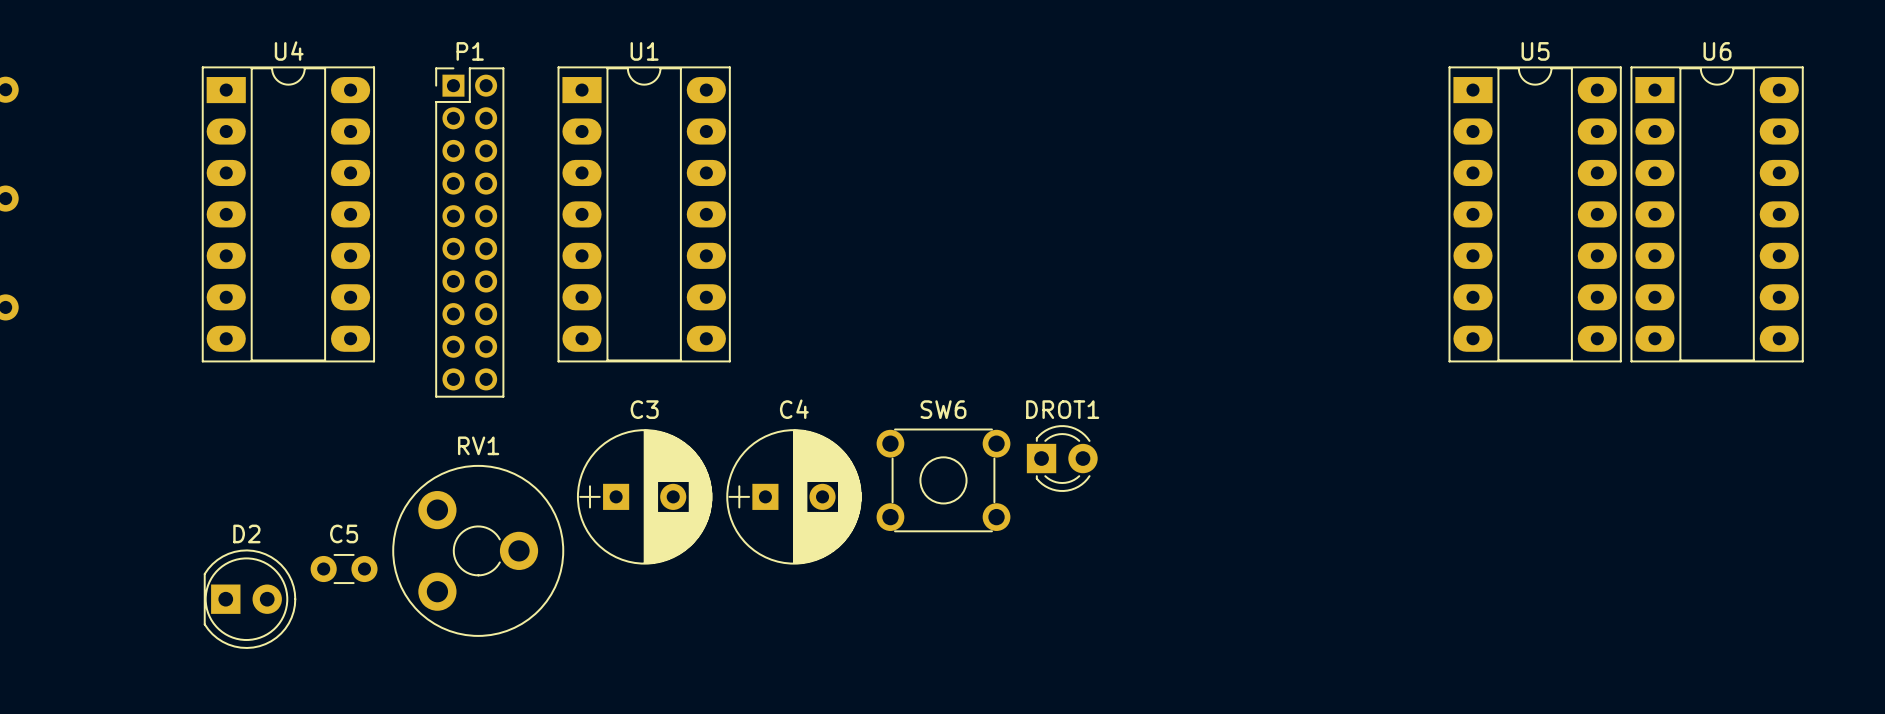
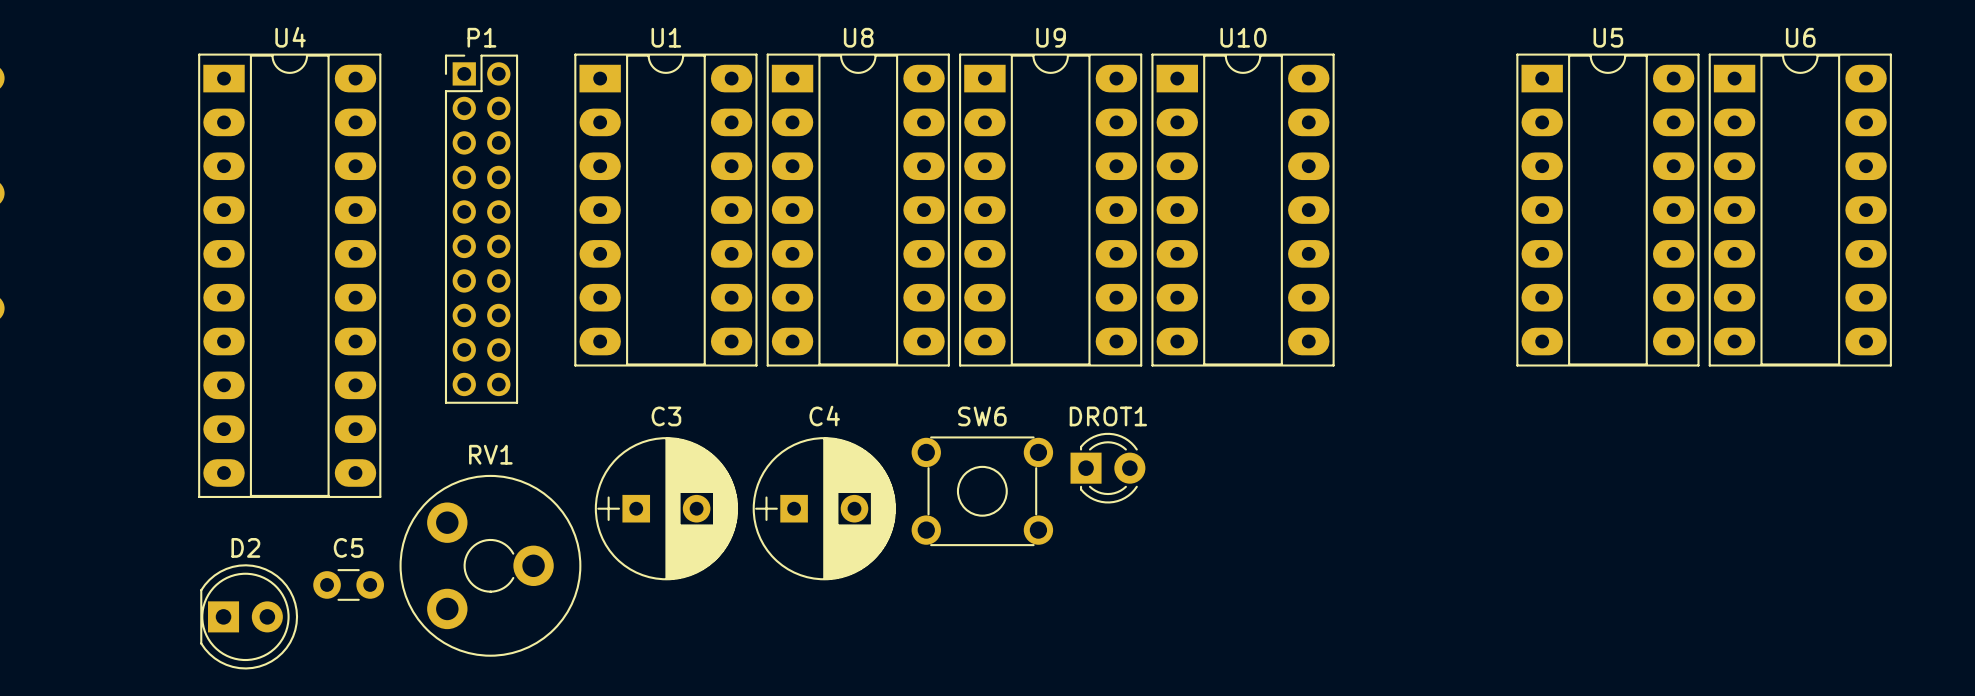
U4 footprint: [201, 66, 376, 363] -> [198, 53, 382, 499]
U8: none -> (858, 210)
U9: none -> (1050, 210)
U10: none -> (1243, 210)

